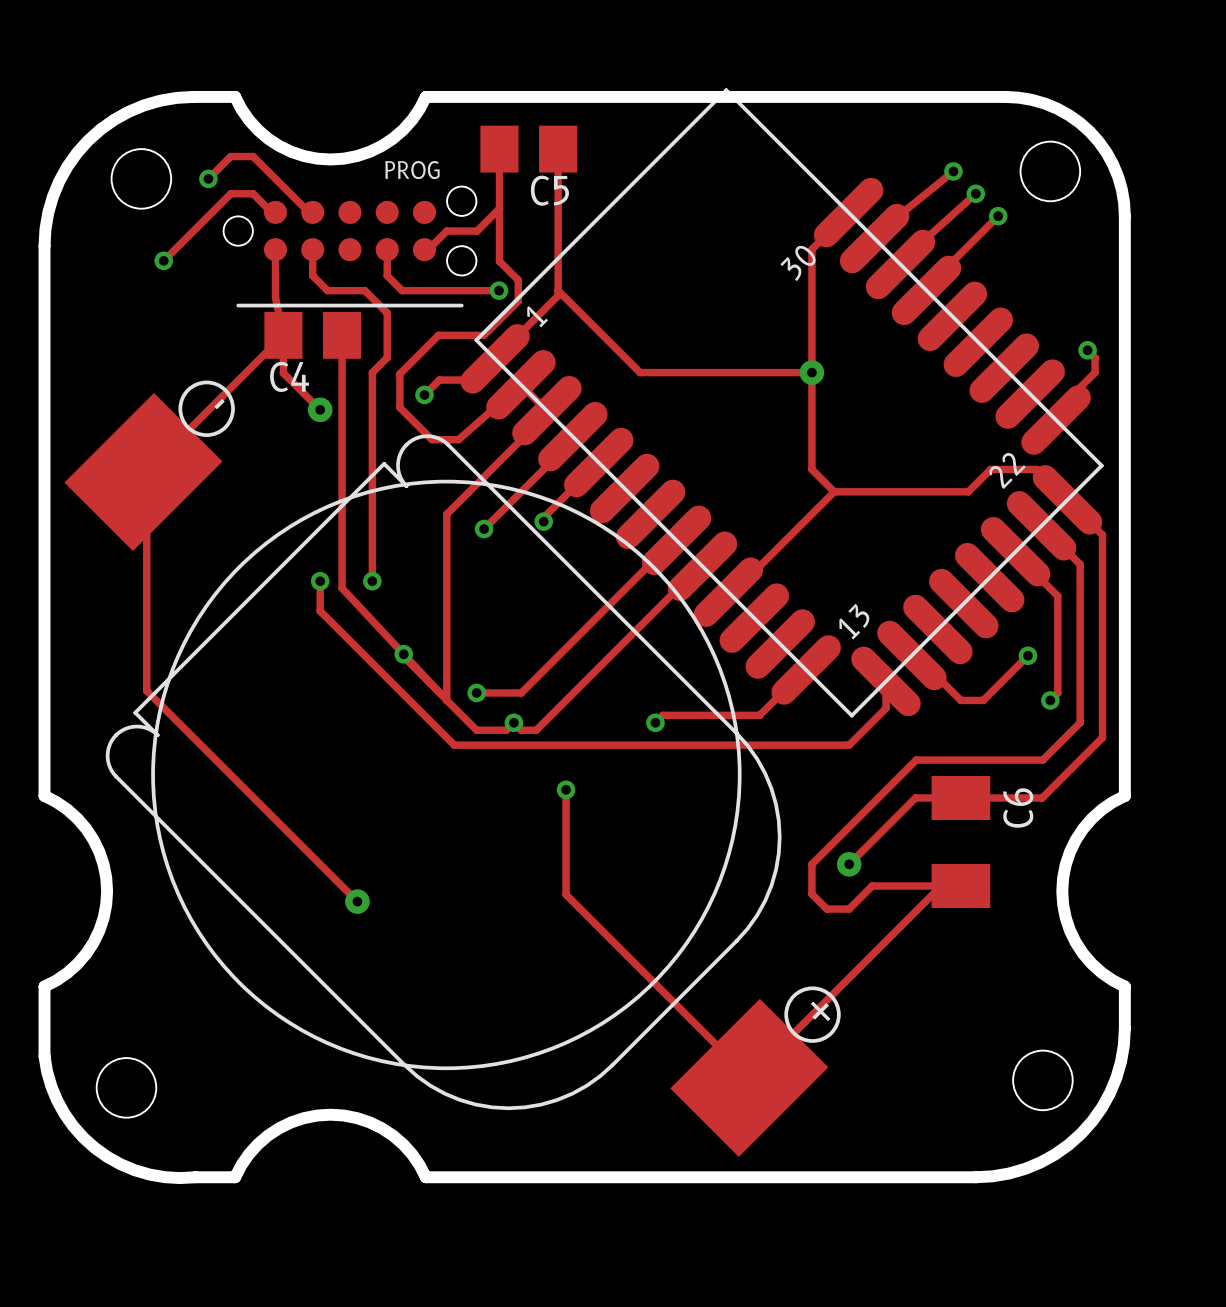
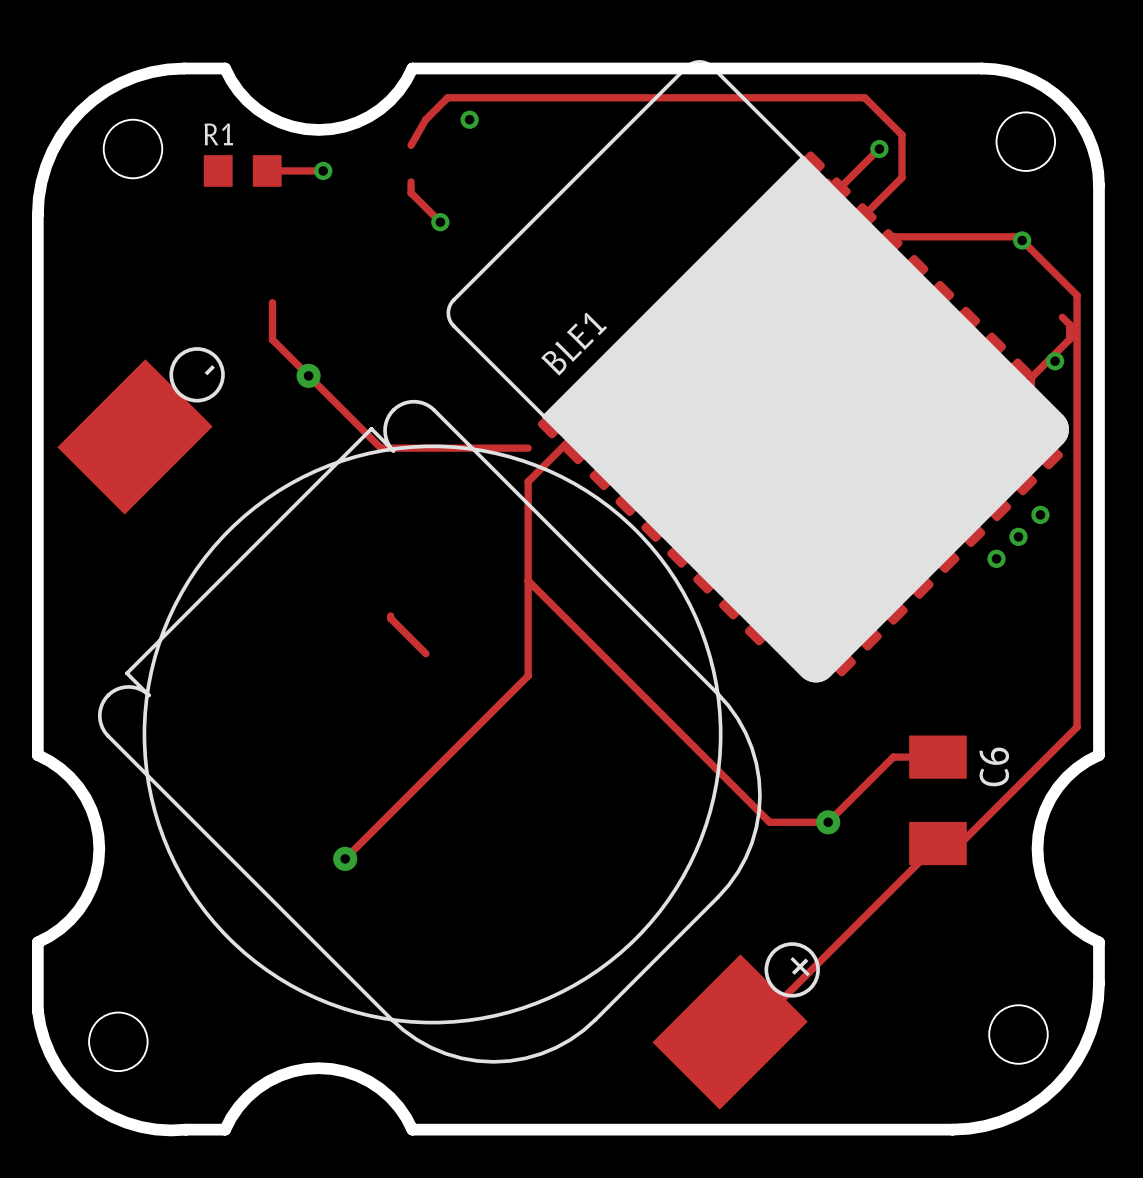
via: none -> (469, 119)
track: (499, 149) (499, 261) (518, 280) (518, 301) (484, 335) (438, 335) (399, 373) (399, 407) (431, 439) (458, 439) (520, 384) (546, 410) (546, 414) (446, 514) (446, 700) -> none
C5: (528, 149) -> none
track: (558, 149) (558, 295) (473, 380) (439, 380) (424, 394) -> none
track: (953, 171) (874, 235) (874, 238) -> none
via: (953, 171) -> none
track: none -> (411, 145) (425, 119) (447, 97) (864, 97) (902, 134) (902, 177) (854, 224)
track: (208, 178) (230, 156) (253, 156) (309, 212) (312, 212) -> none
via: (208, 178) -> none
track: none -> (879, 149) (828, 199)
via: none -> (879, 149)
track: (975, 193) (900, 261) (900, 264) -> none
via: (975, 193) -> none
R1: none -> (242, 170)
track: none -> (267, 170) (323, 170)
via: none -> (323, 170)
track: (499, 208) (477, 231) (446, 231) (428, 249) (424, 249) -> none
track: (275, 212) (271, 212) (253, 193) (230, 193) (163, 260) -> none
track: none -> (411, 181) (411, 192) (440, 222)
track: (998, 216) (926, 287) (926, 290) -> none
via: (998, 216) -> none
PROG: (349, 246) -> none
track: (275, 249) (275, 297) (283, 335) (146, 472) (146, 690) (357, 901) -> (528, 485) (528, 675) (345, 858)
track: (312, 249) (312, 275) (327, 290) (364, 290) (387, 313) (387, 357) (372, 372) (372, 581) -> none
track: (387, 249) (387, 275) (402, 290) (499, 290) -> none
via: (163, 260) -> none
via: none -> (1022, 240)
via position: (499, 290) -> (440, 222)
track: (558, 290) (640, 372) (811, 372) (811, 469) (834, 491) -> none
C4: (312, 335) -> none
track: (342, 335) (342, 588) (446, 700) -> none
via: (1087, 350) -> none
via: (424, 394) -> none
via: none -> (1055, 361)
part: (781, 402) -> none
BLE1: none -> (757, 371)
track: none -> (308, 375) (380, 448) (528, 448)
track: (572, 436) (572, 440) (484, 529) -> none
track: (834, 491) (968, 491) (990, 469) (1037, 469) (1102, 534) -> (880, 250) (894, 236) (1018, 236) (1077, 295) (1077, 498)
track: (834, 491) (733, 592) (728, 592) -> none
via: (543, 521) -> none
track: (1041, 525) (1080, 564) (1080, 722) (1042, 760) (916, 760) (811, 864) (811, 894) (826, 909) (849, 909) (872, 885) (960, 885) -> none
via: (484, 529) -> none
track: (676, 540) (674, 540) (521, 692) (476, 692) -> none
track: (1015, 551) (1015, 553) (1057, 596) (1057, 692) (1050, 700) -> none
via: none -> (1040, 514)
track: (702, 566) (700, 566) (536, 730) (521, 730) (513, 722) (506, 730) (476, 730) (446, 700) -> none
via: none -> (1018, 536)
track: (320, 581) (320, 611) (454, 745) (849, 745) (886, 708) (886, 681) -> none
via: (320, 581) -> none
via: (372, 581) -> none
via: none -> (996, 558)
track: none -> (528, 580) (769, 822) (828, 822)
via: (403, 654) -> none
track: (911, 655) (915, 655) (960, 700) (983, 700) (1027, 655) -> none
via: (1027, 655) -> none
track: (806, 669) (759, 715) (662, 715) (655, 722) -> none
via: (476, 692) -> none
via: (1050, 700) -> none
via: (513, 722) -> none
via: (655, 722) -> none
track: (1102, 737) (1042, 797) (960, 797) -> (1077, 697) (1077, 727) (960, 843) (937, 843) (749, 1032) (730, 1032)
track: (566, 789) (566, 894) (749, 1077) (941, 885) -> none
via: (566, 789) -> none

